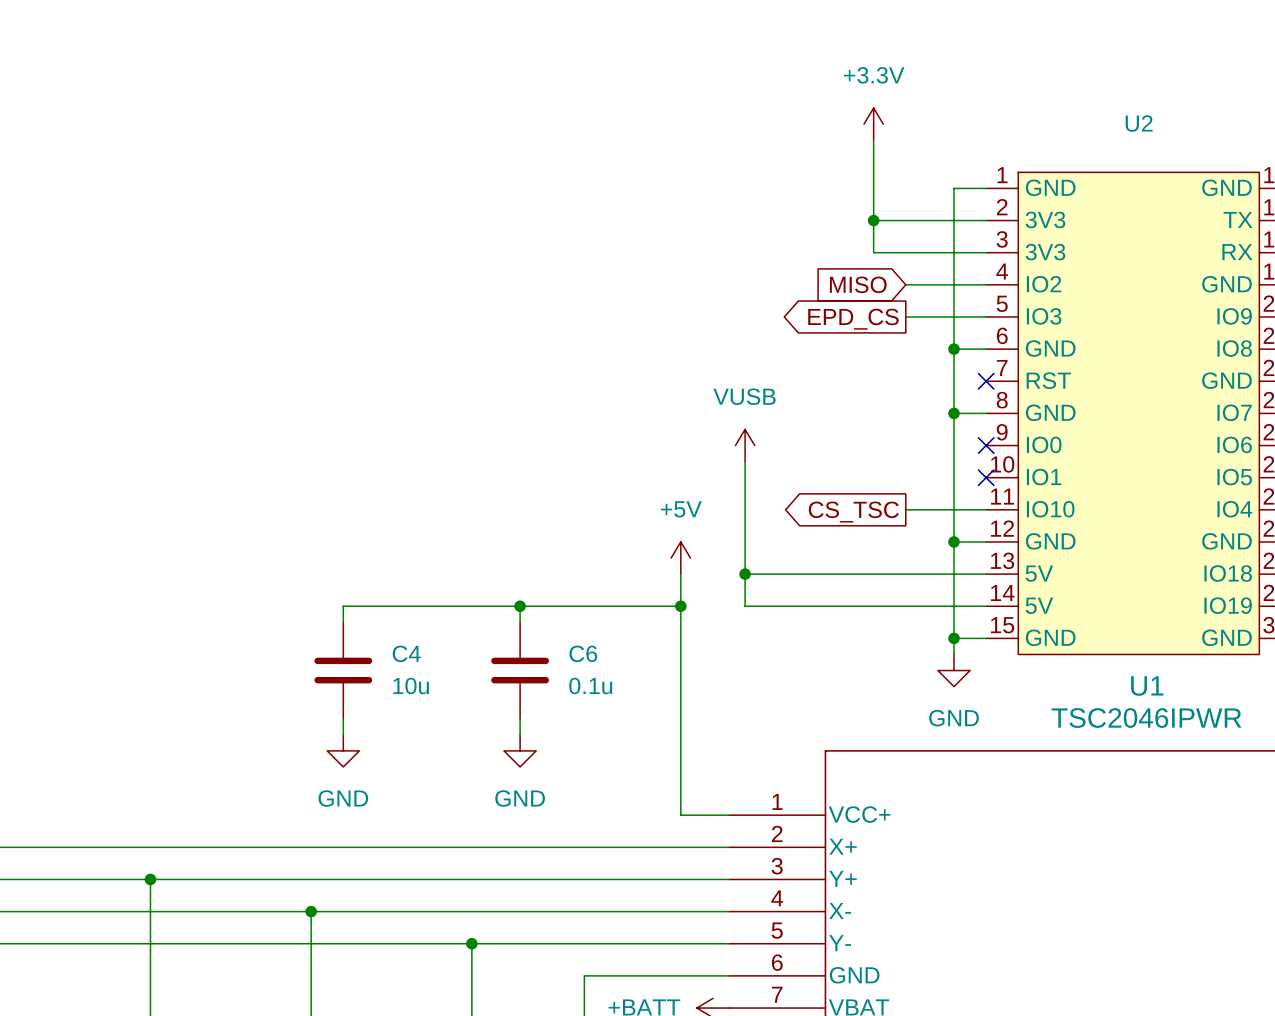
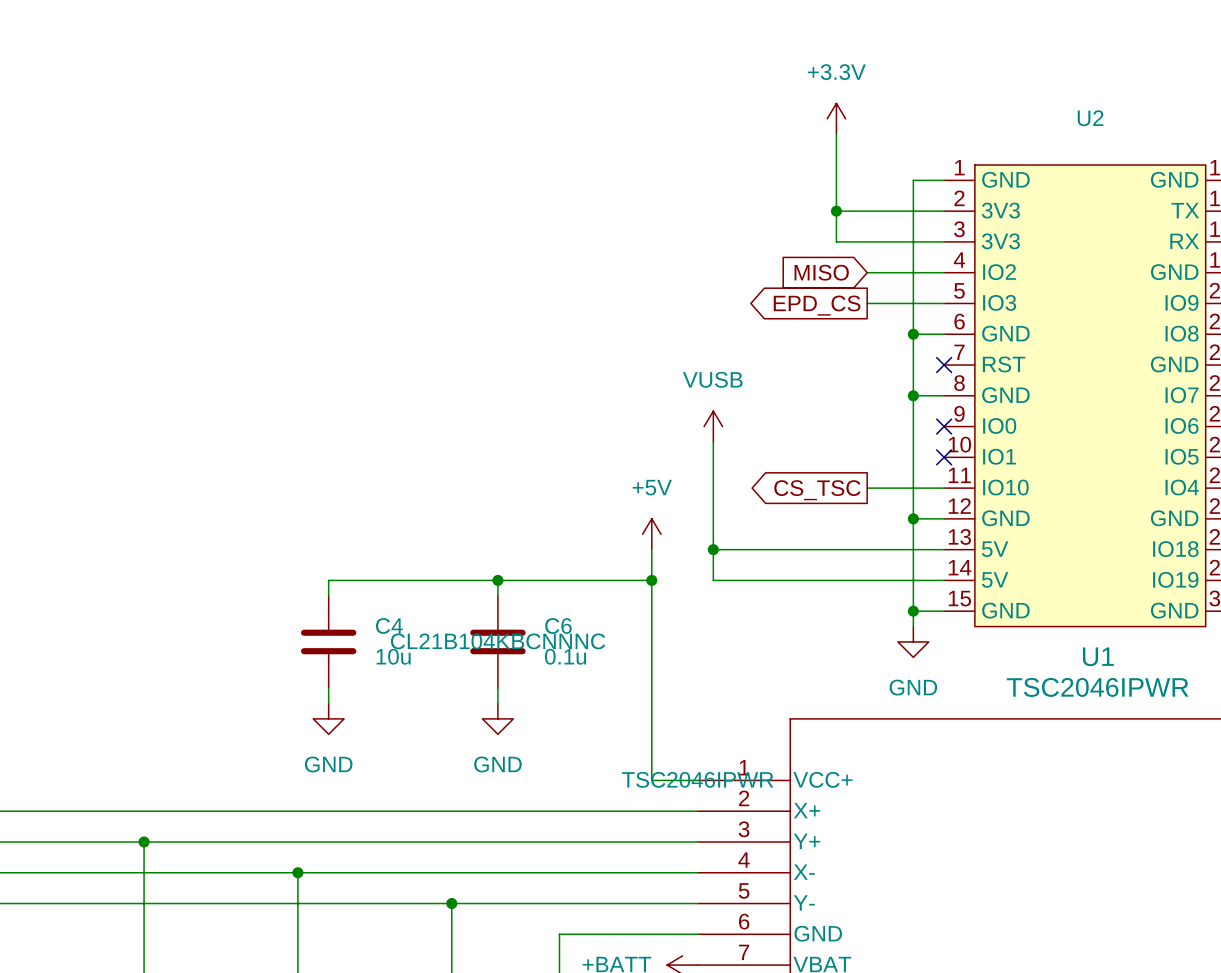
C6 text: none -> CL21B104KBCNNNC (498, 641)
U1 text: none -> TSC2046IPWR (697, 779)

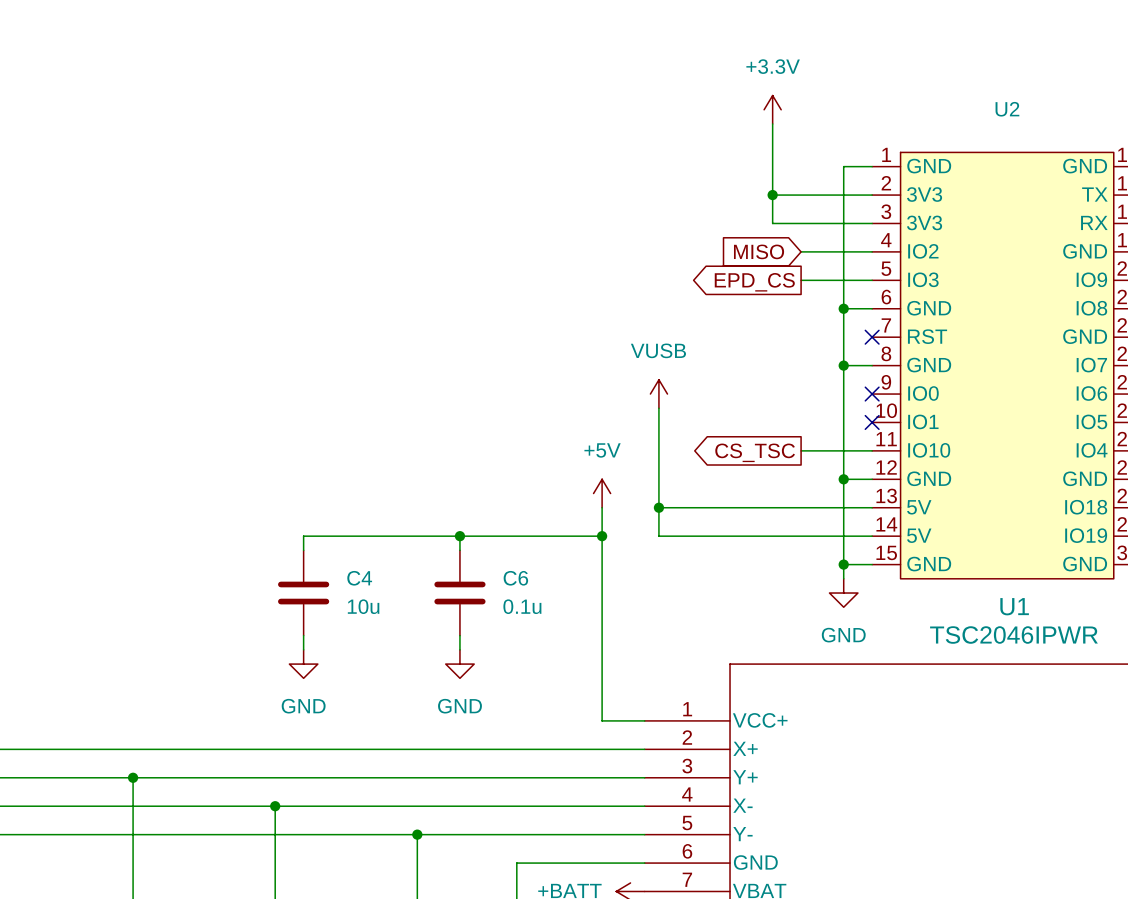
C6 text: CL21B104KBCNNNC (498, 641) -> none
U1 text: TSC2046IPWR (697, 779) -> none

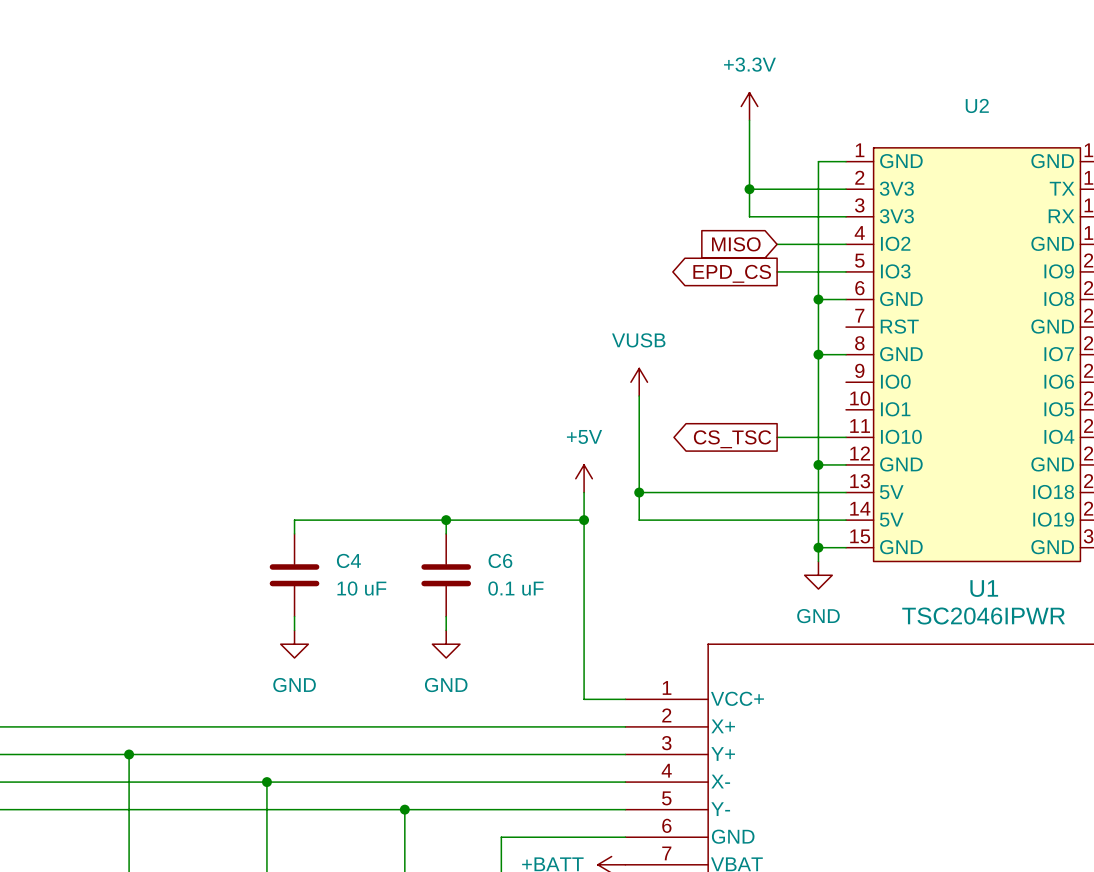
no-connect mark: (872, 337) -> none
no-connect mark: (872, 394) -> none
no-connect mark: (872, 422) -> none
C4 value: 10u (363, 606) -> 10 uF (361, 588)
C6 value: 0.1u (522, 606) -> 0.1 uF (515, 588)

